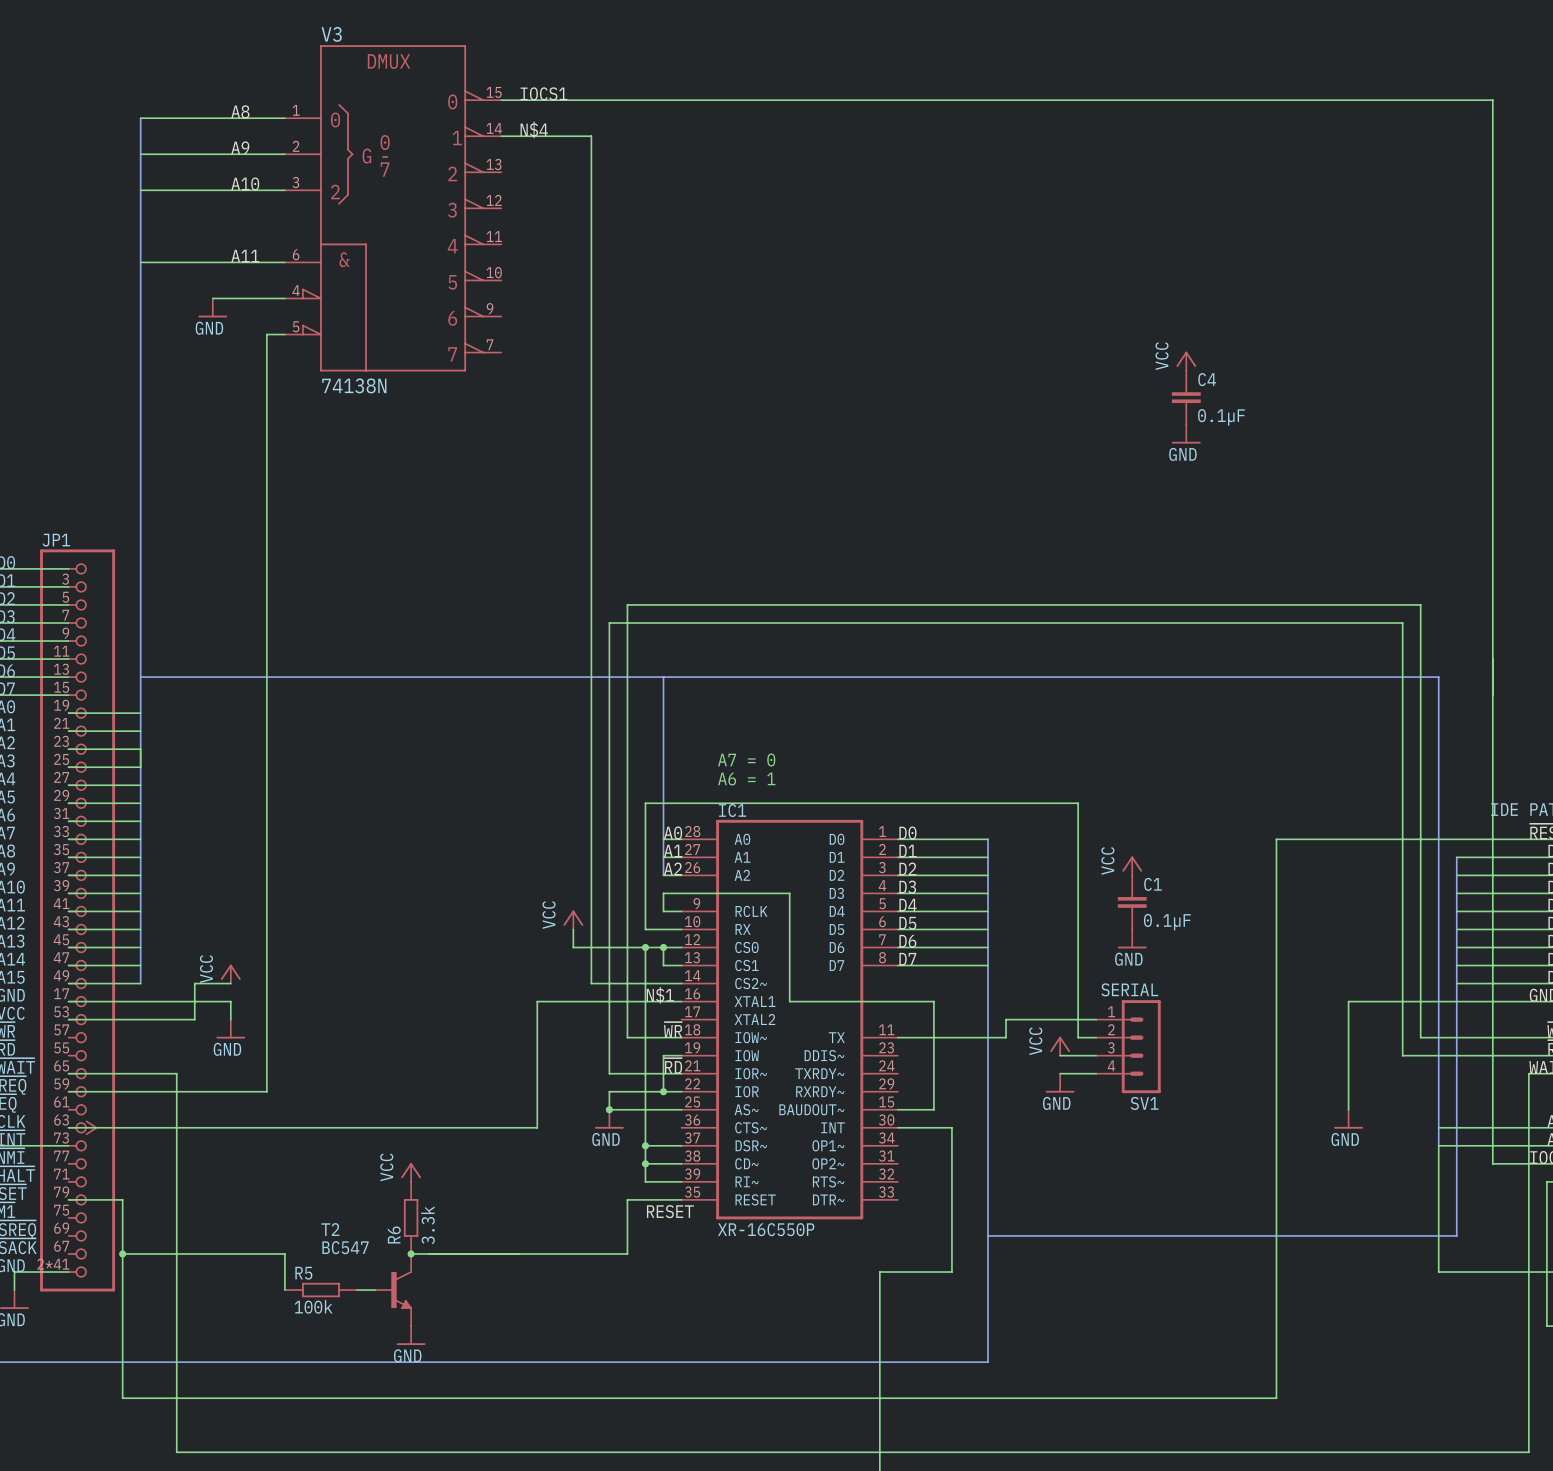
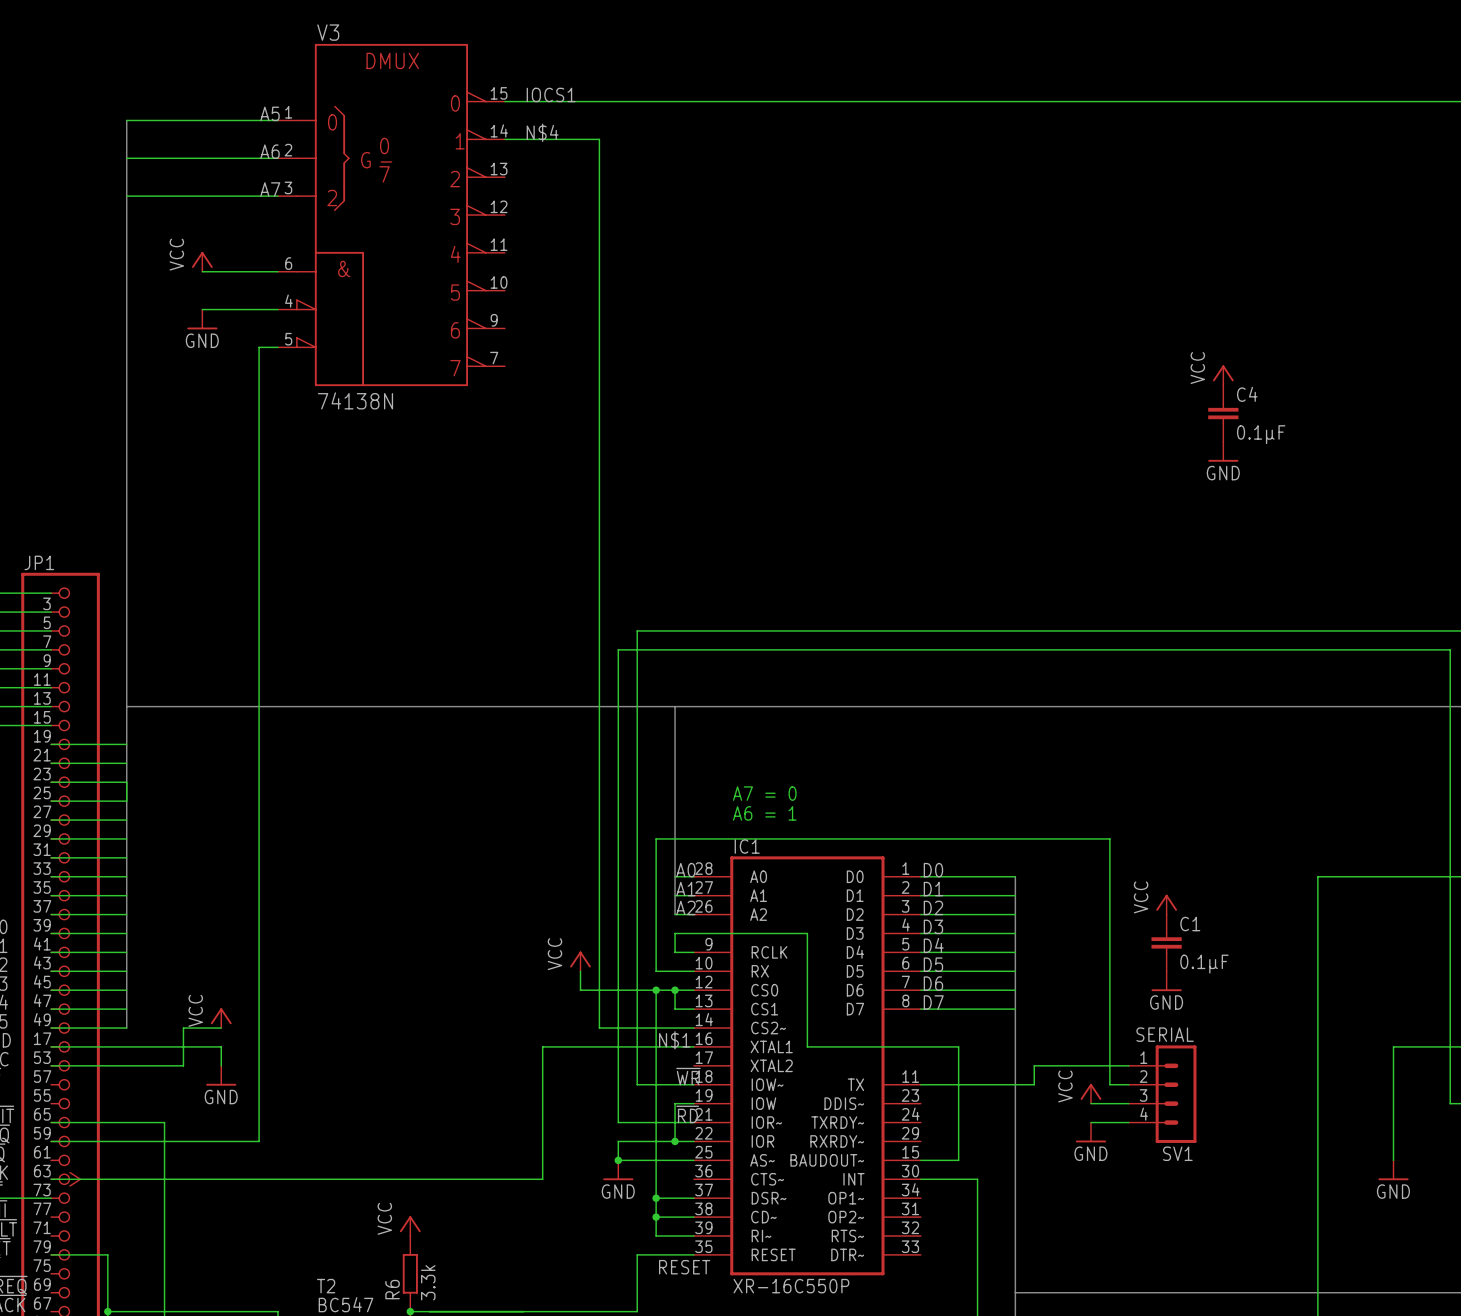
label: A8 (240, 111) -> none
label: none -> A5 (269, 113)
label: A9 (240, 147) -> none
label: none -> A6 (269, 151)
label: A10 (245, 183) -> none
label: none -> A7 (270, 189)
power symbol: none -> VCC (202, 261)
label: A11 (245, 256) -> none
wire: (140, 262) (212, 262) -> none

